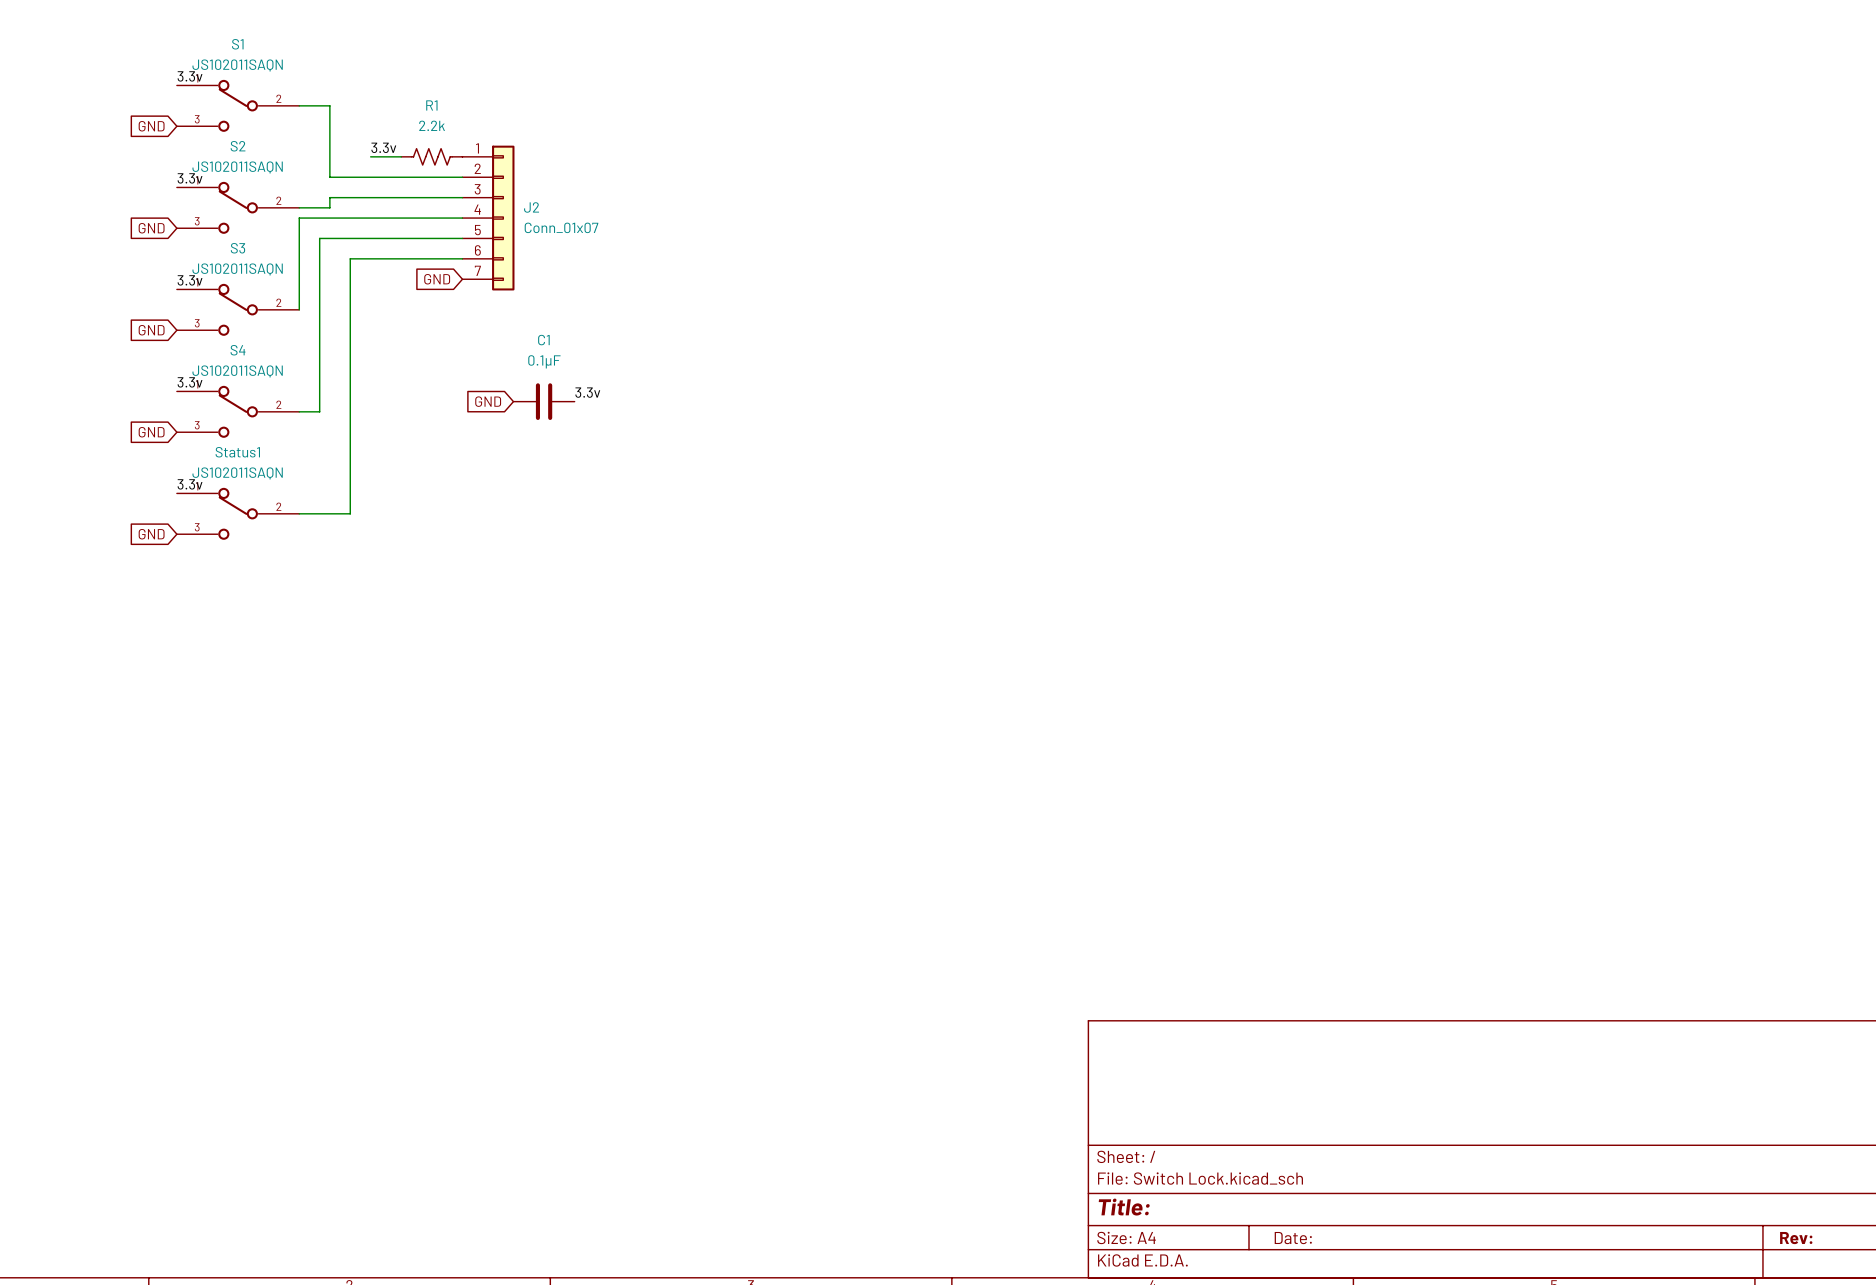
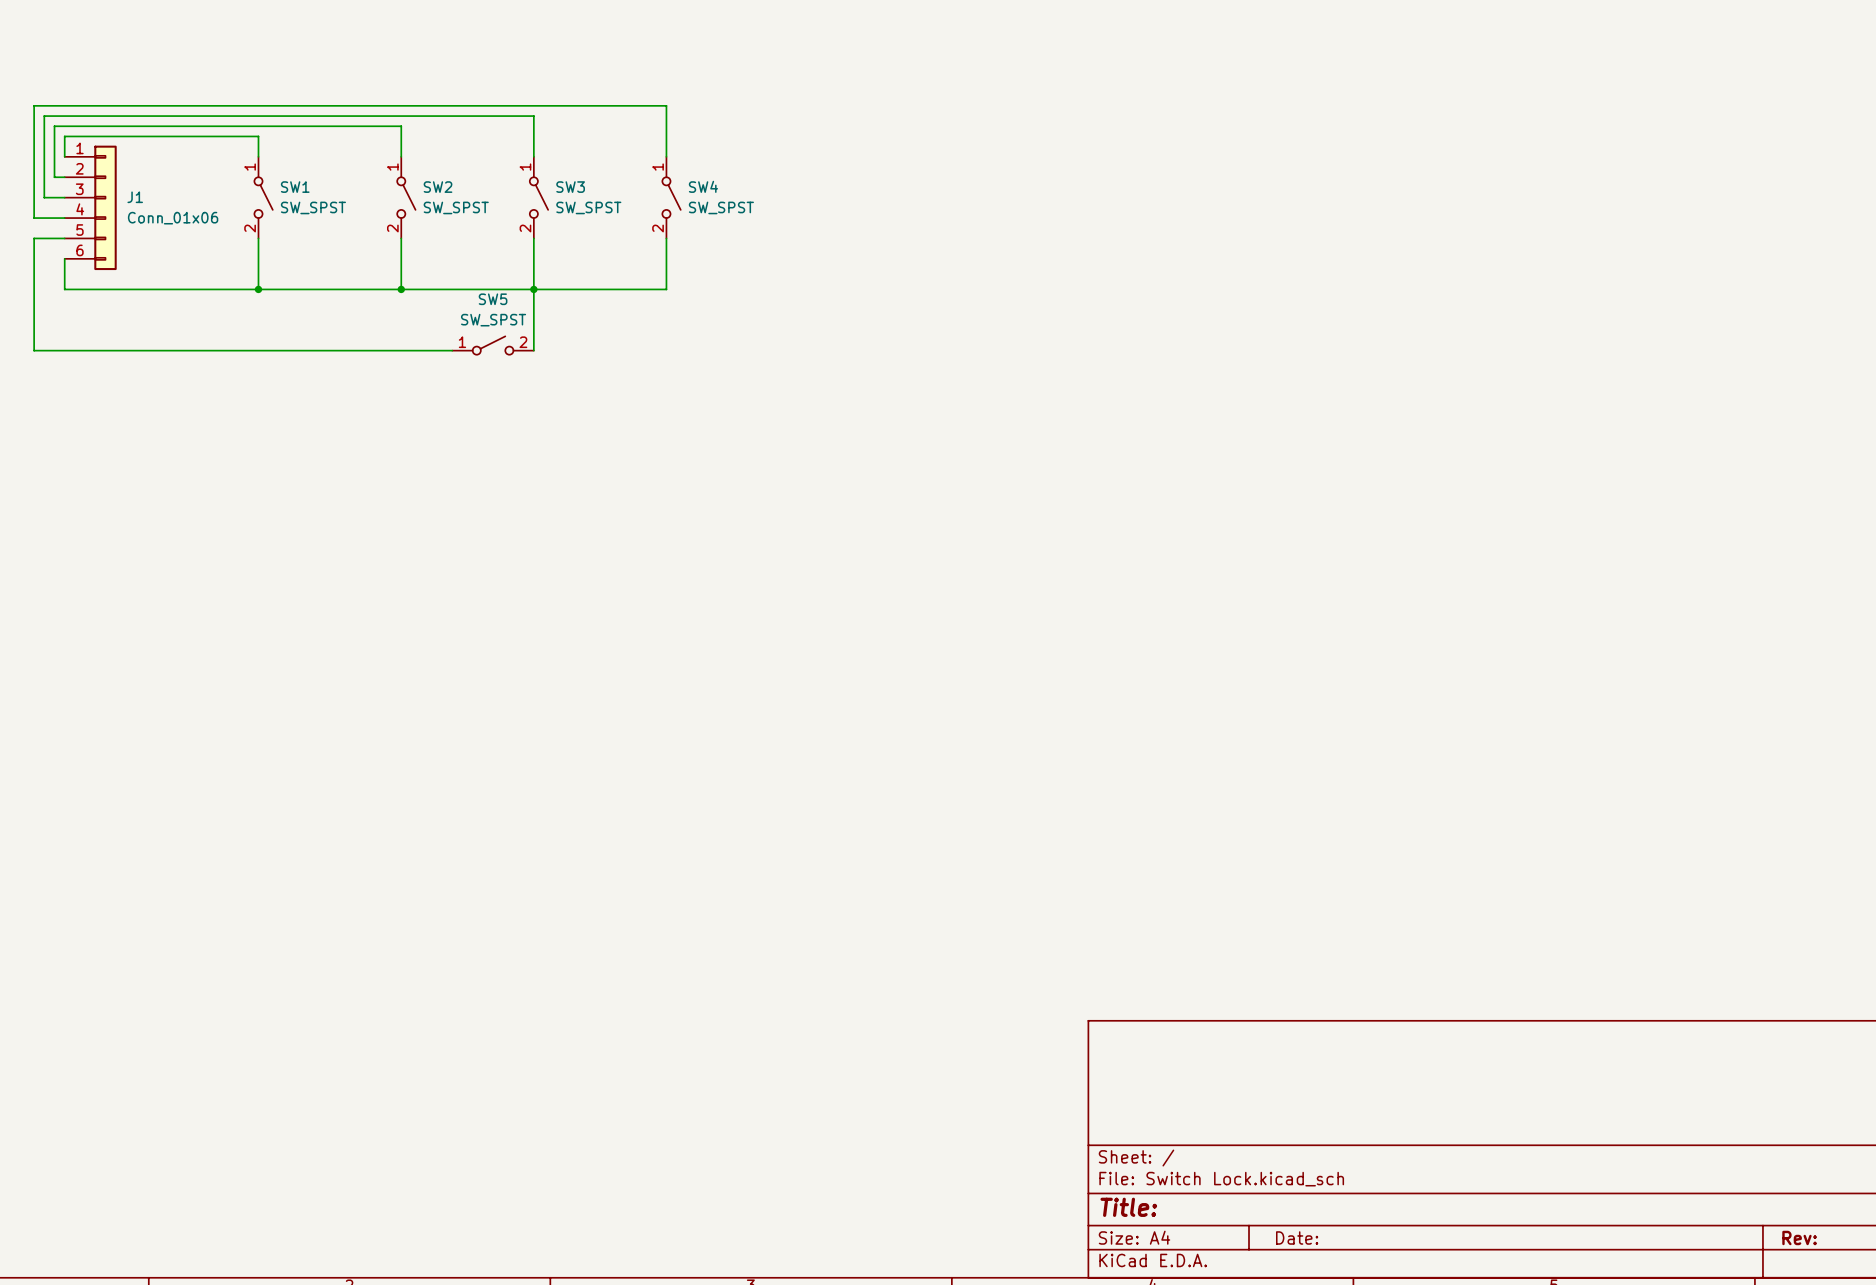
label: 3.3v (190, 76) -> none
S1: JS102011SAQN (238, 105) -> none
wire: none -> (299, 105) (34, 105) (34, 218) (64, 218)
wire: (329, 105) (329, 177) (462, 177) -> (329, 105) (666, 105) (666, 156)
global label: GND (151, 126) -> none
label: 3.3v (383, 147) -> none
wire: none -> (64, 156) (64, 136) (258, 136) (258, 156)
wire: (370, 156) (401, 156) -> (64, 177) (54, 177) (54, 126) (401, 126) (401, 156)
R1: 2.2k (431, 156) -> none
wire: none -> (533, 156) (533, 116) (44, 116) (44, 197) (64, 197)
label: 3.3v (190, 178) -> none
SW1: none -> SW_SPST (263, 197)
SW2: none -> SW_SPST (406, 197)
wire: (462, 197) (329, 197) (329, 207) (299, 207) -> none
SW3: none -> SW_SPST (538, 197)
SW4: none -> SW_SPST (671, 197)
J1: none -> Conn_01x06 (90, 207)
S2: JS102011SAQN (238, 207) -> none
wire: (462, 218) (299, 218) (299, 309) -> none
J2: Conn_01x07 (488, 218) -> none
global label: GND (151, 228) -> none
wire: none -> (64, 238) (34, 238) (34, 350) (452, 350)
wire: none -> (258, 238) (258, 289)
wire: none -> (401, 238) (401, 289)
wire: (462, 238) (319, 238) (319, 411) (299, 411) -> none
wire: none -> (533, 238) (533, 350)
wire: none -> (666, 238) (666, 289) (64, 289) (64, 258)
wire: (462, 258) (350, 258) (350, 513) (299, 513) -> none
global label: GND (437, 279) -> none
label: 3.3v (190, 280) -> none
junction: none -> (258, 289)
junction: none -> (401, 289)
junction: none -> (533, 289)
S3: JS102011SAQN (238, 309) -> none
global label: GND (151, 330) -> none
SW5: none -> SW_SPST (493, 345)
label: 3.3v (190, 382) -> none
label: 3.3v (587, 392) -> none
global label: GND (488, 401) -> none
C1: 0.1μF (544, 401) -> none
S4: JS102011SAQN (238, 411) -> none
global label: GND (151, 432) -> none
label: 3.3v (190, 484) -> none
Status1: JS102011SAQN (238, 513) -> none
global label: GND (151, 534) -> none

